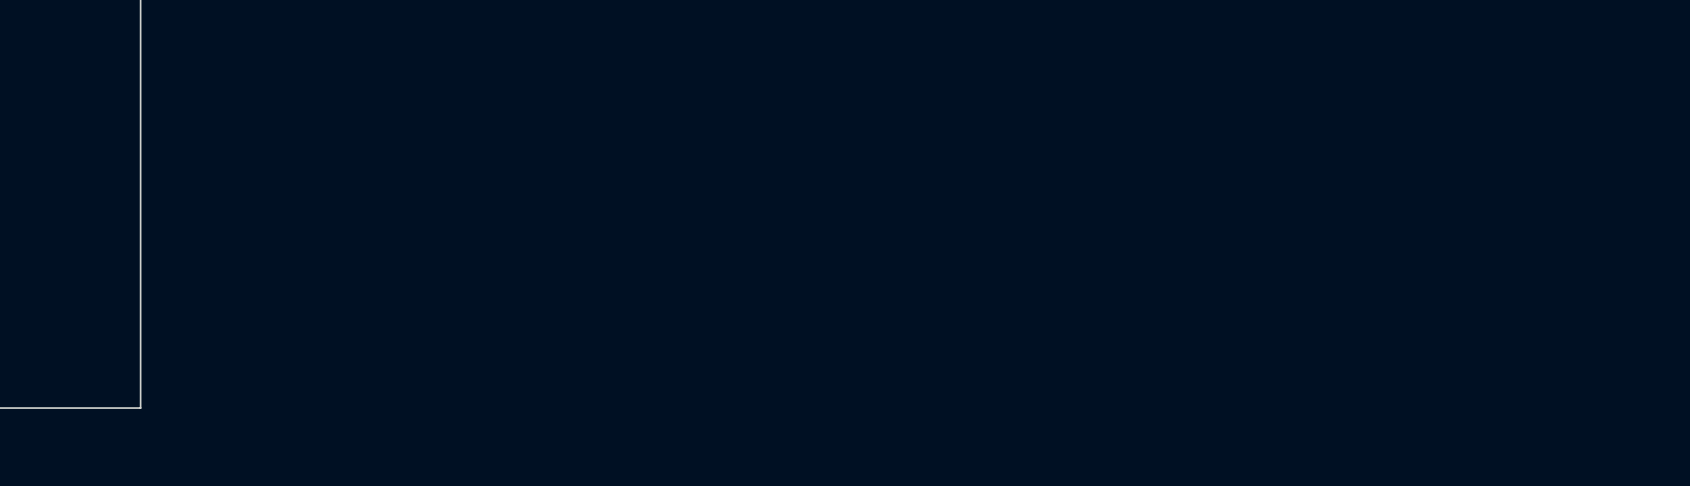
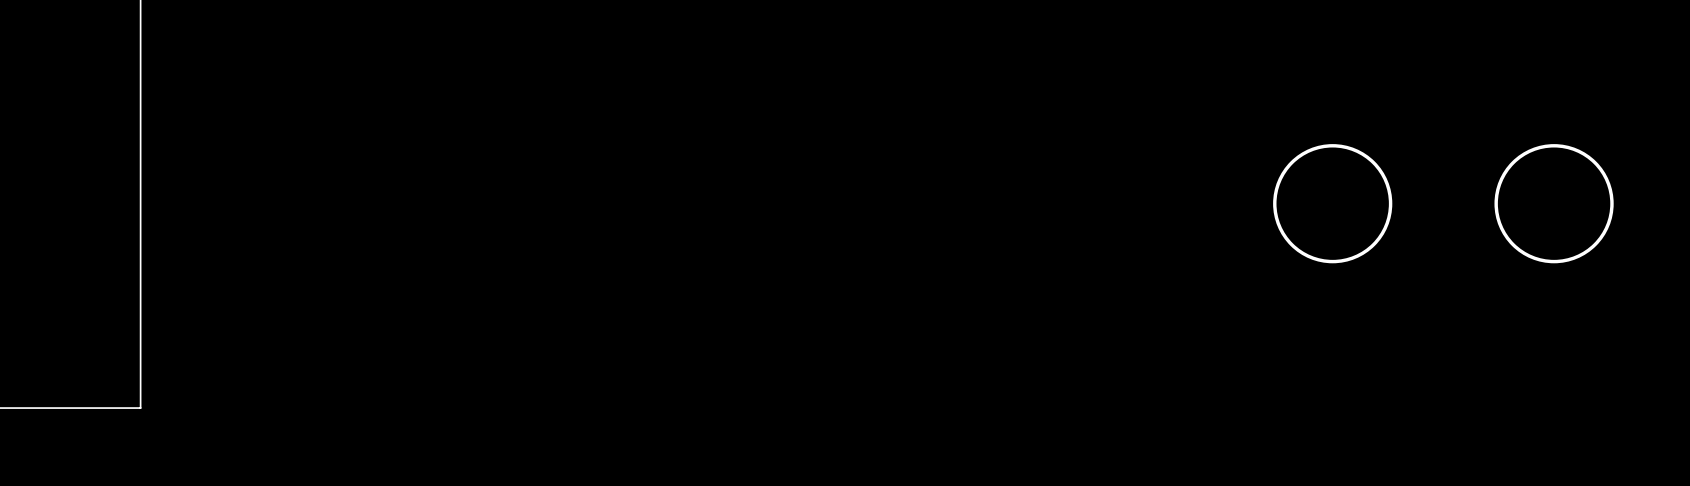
round board edge: none -> [1273, 144, 1393, 264]
round board edge: none -> [1494, 144, 1614, 264]

